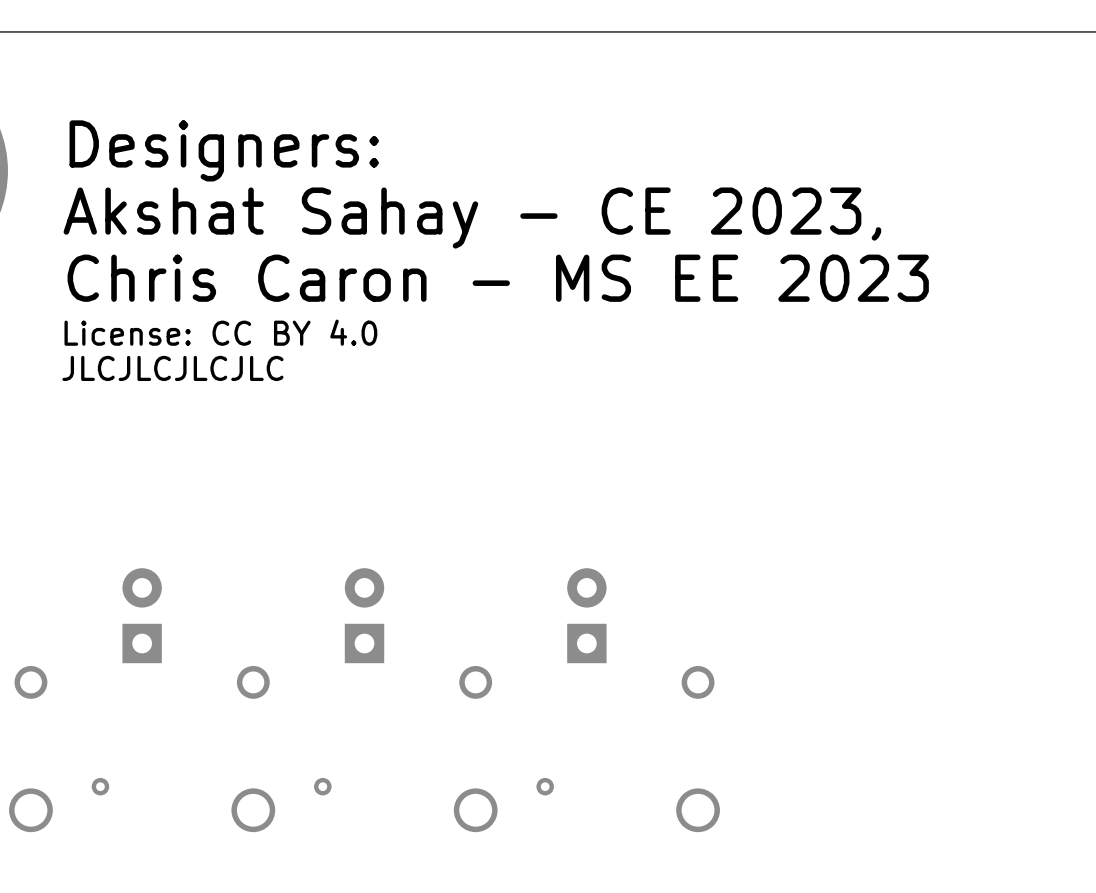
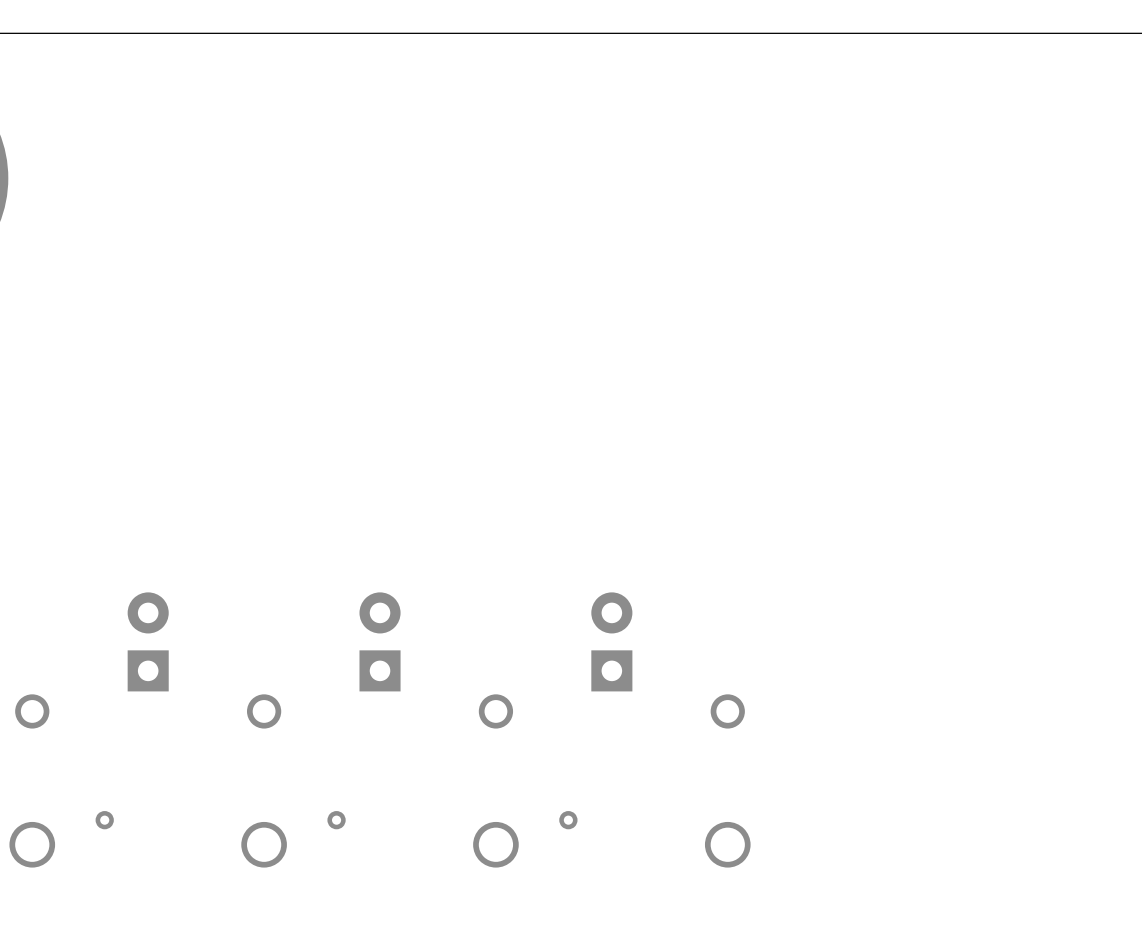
text: Designers: (224, 150) -> none
text: Akshat Sahay - CE 2023, (472, 218) -> none
text: Chris Caron - MS EE 2023 (498, 278) -> none
text: License: CC BY 4.0 (220, 332) -> none
text: JLCJLCJLCJLC (172, 368) -> none

